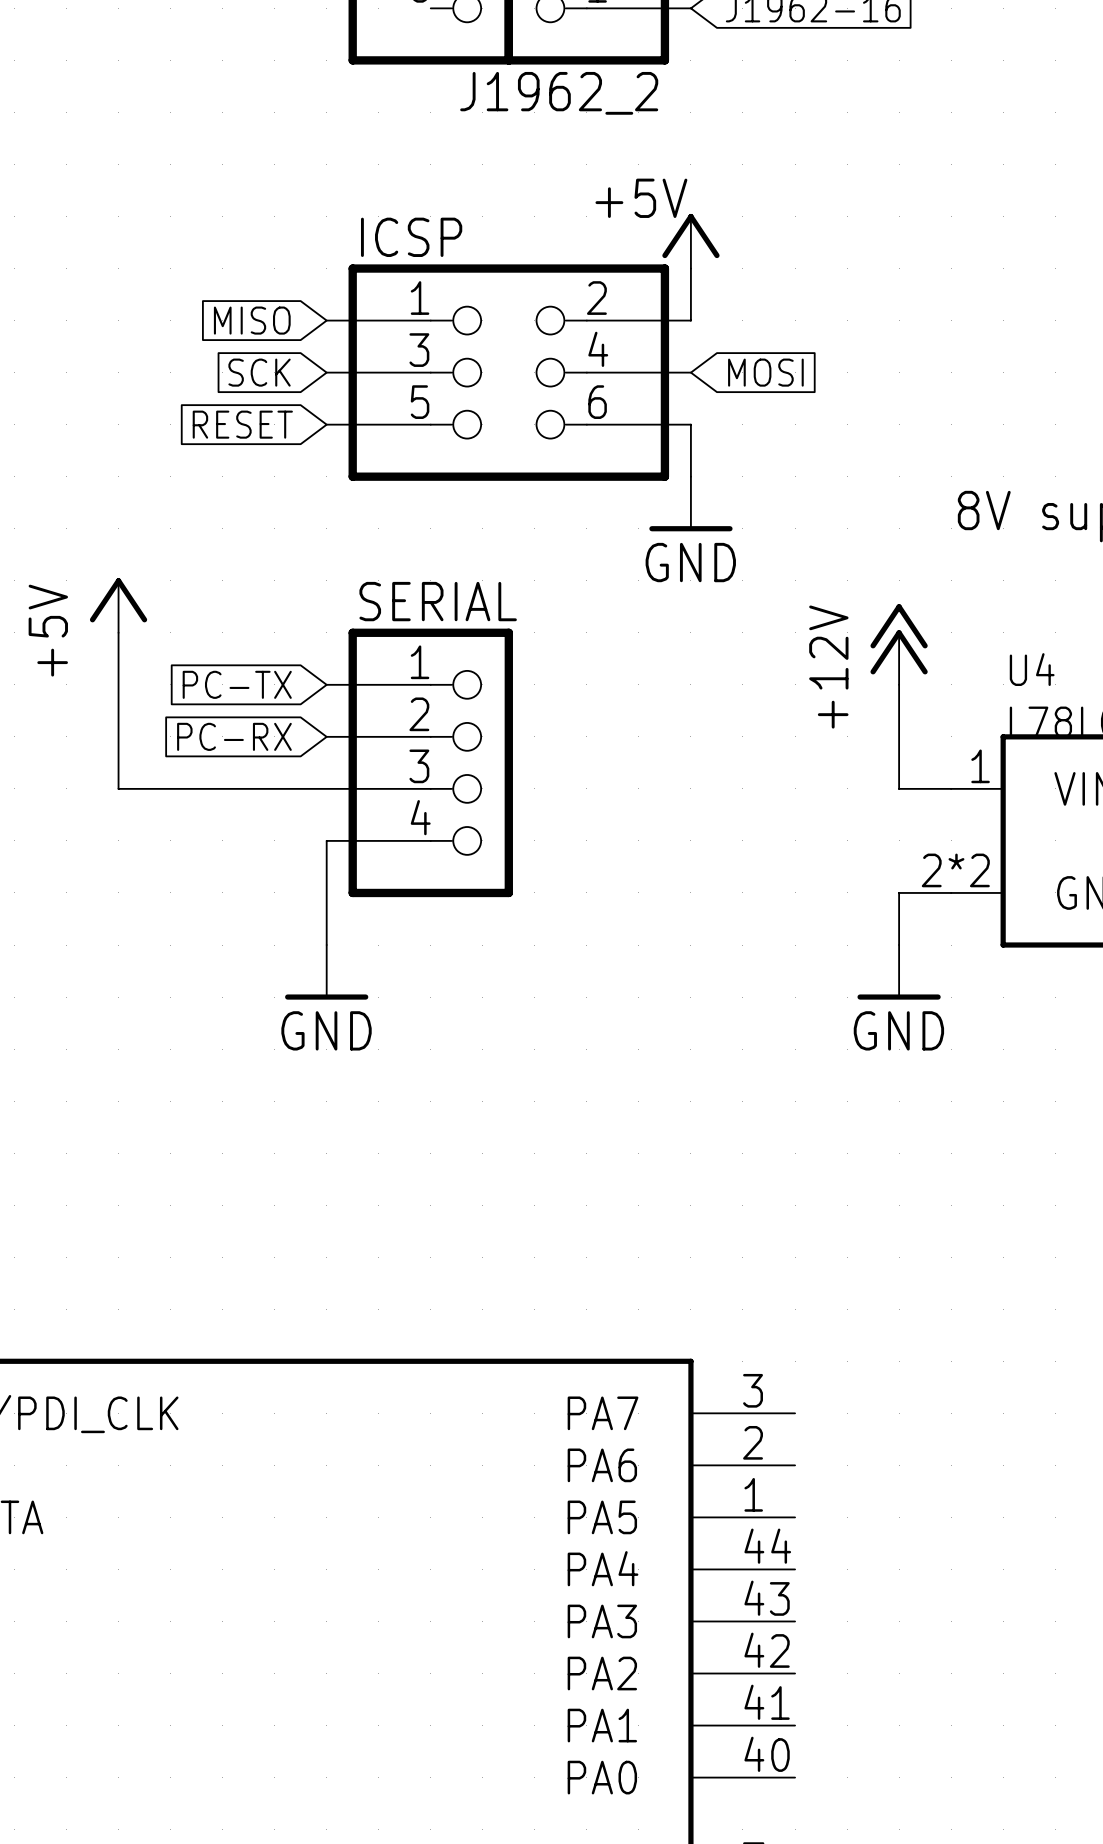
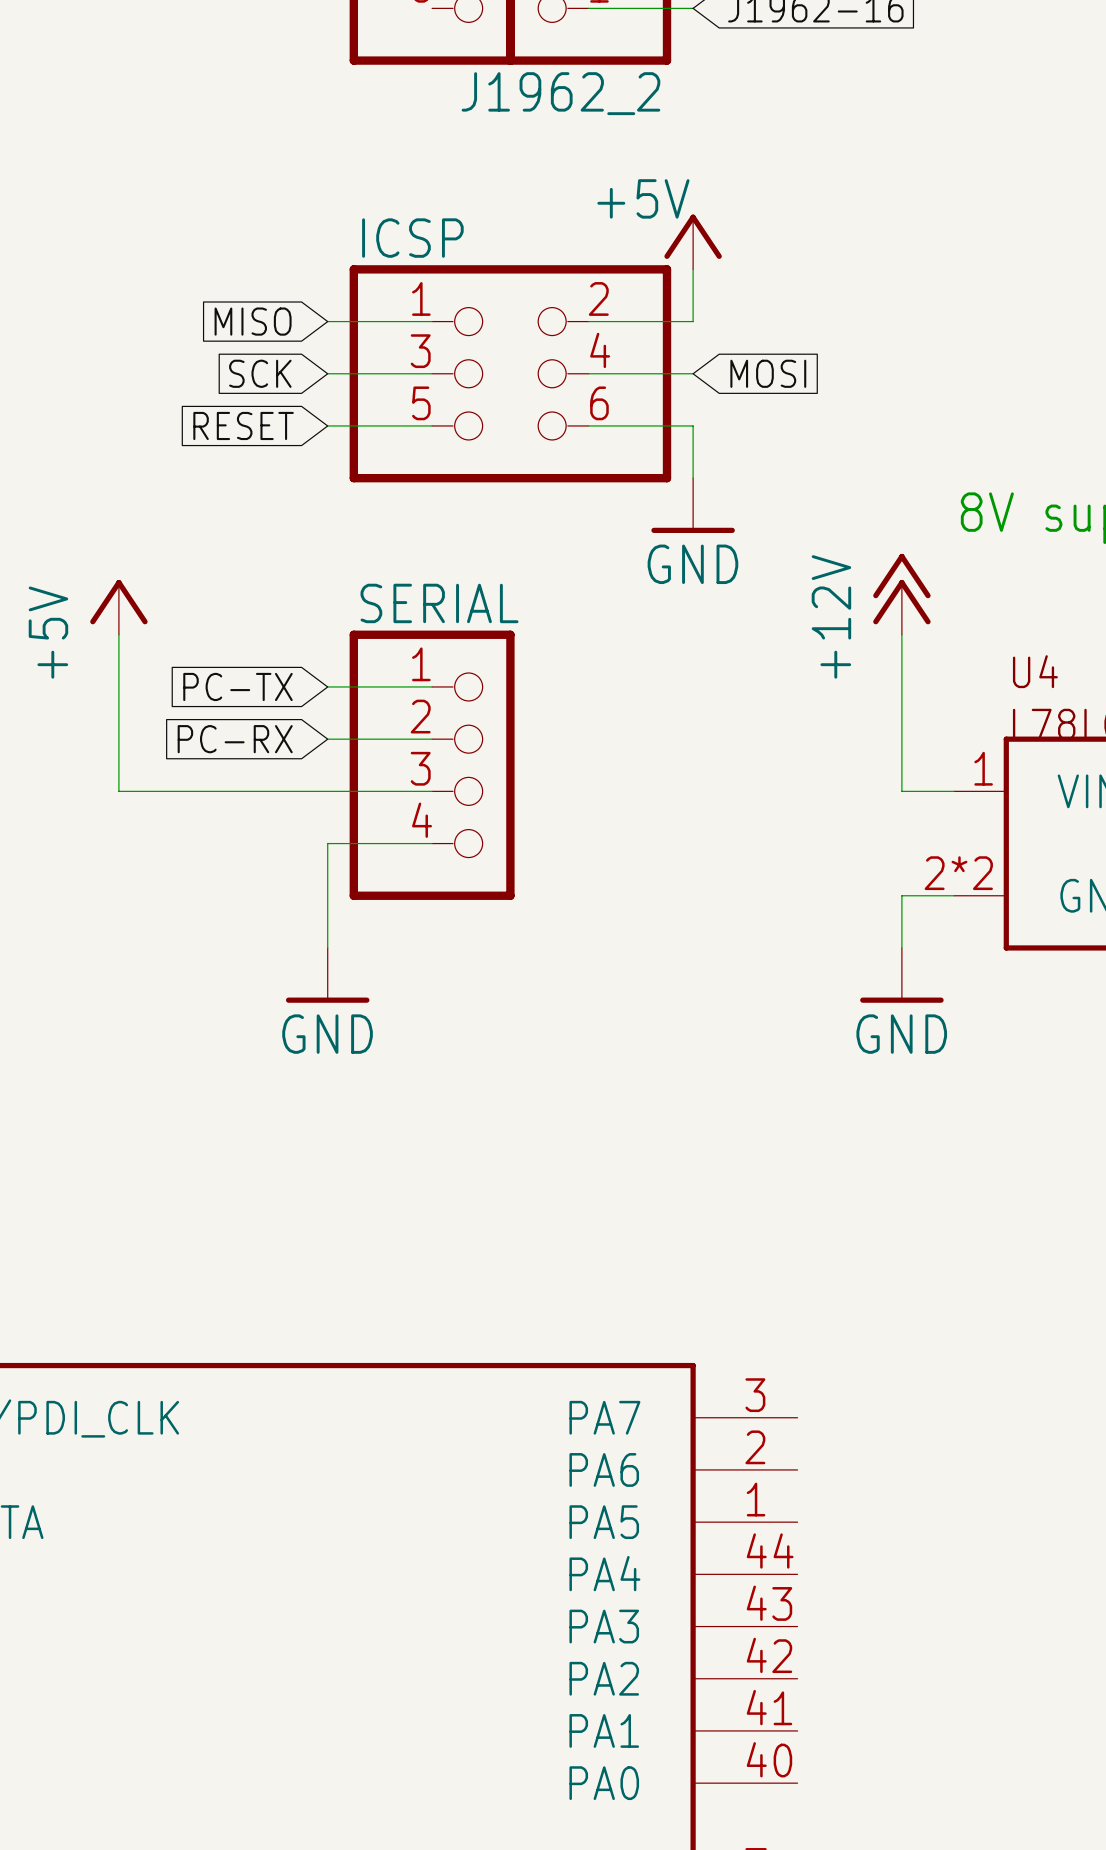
power symbol position: +12V (899, 644) -> +12V (901, 594)

